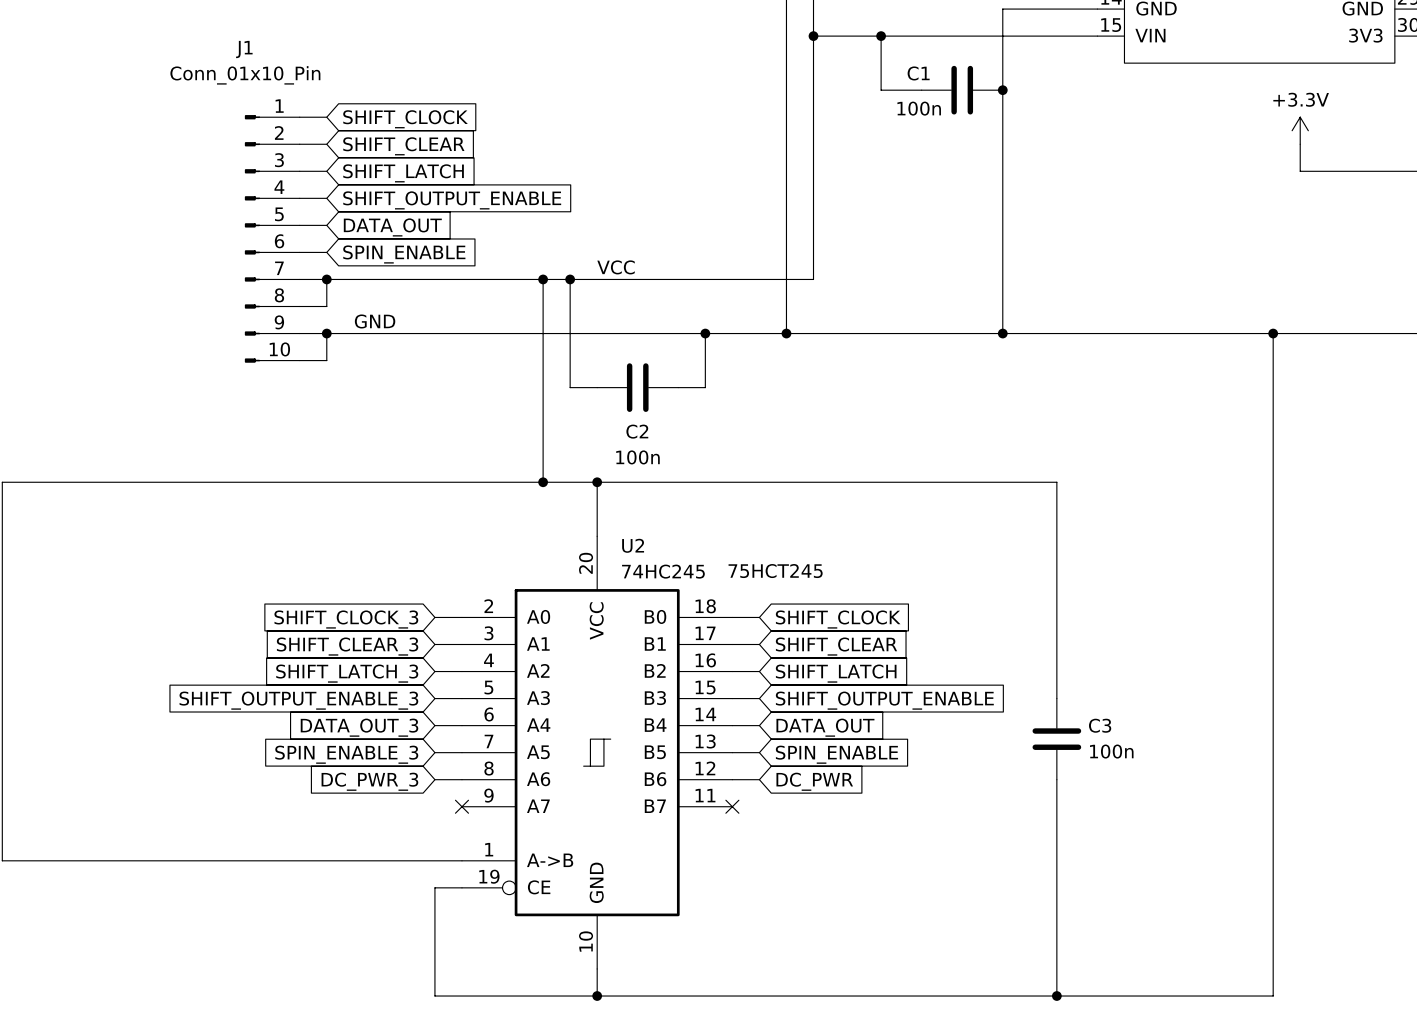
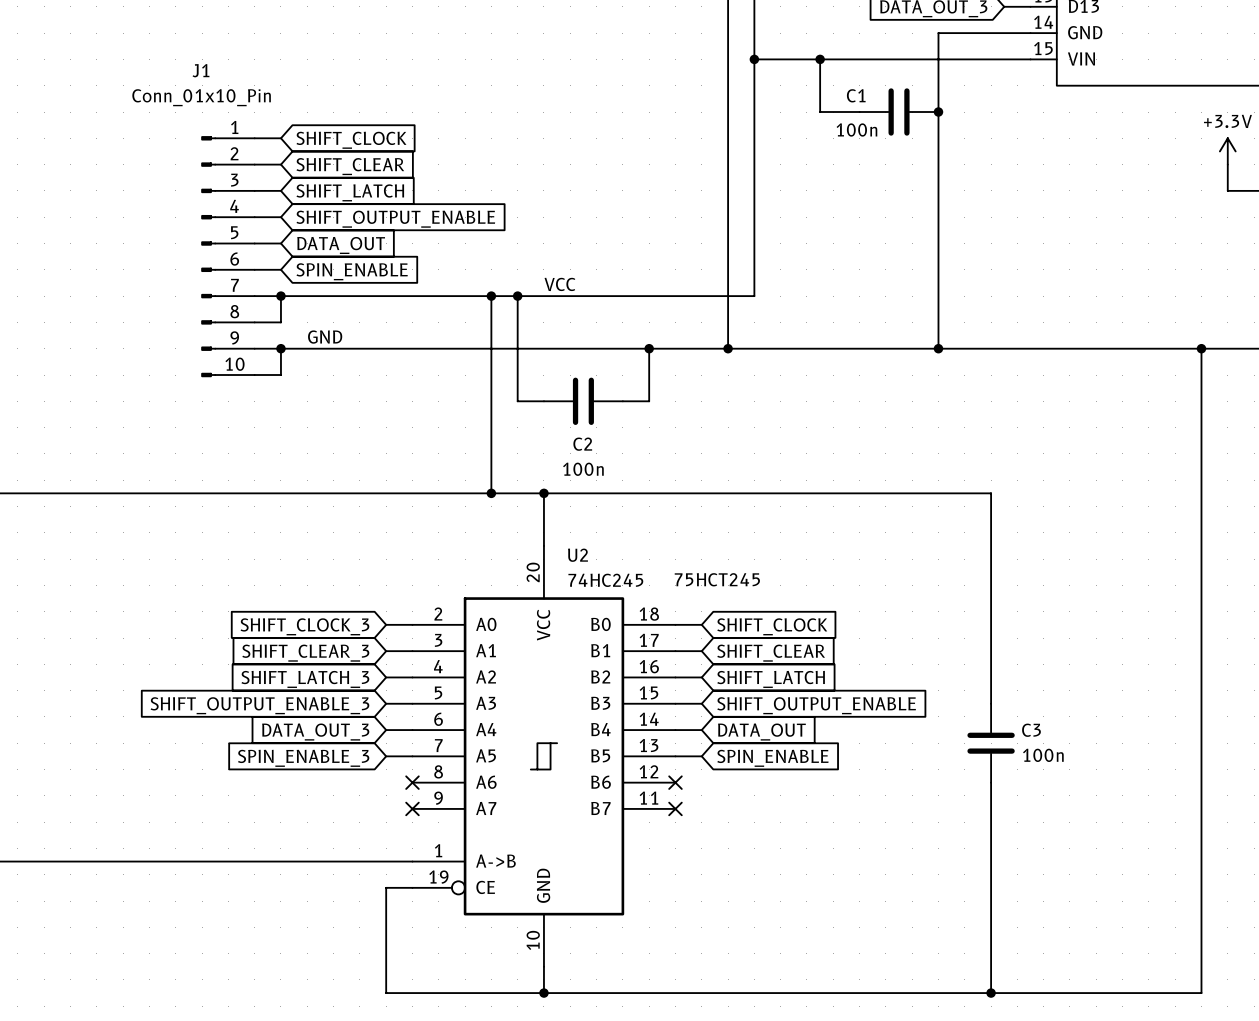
wire: (434, 779) (461, 779) -> none
no-connect mark: none -> (412, 782)
wire: (732, 779) (759, 779) -> none
no-connect mark: none -> (675, 782)
global label: DC_PWR_3 (369, 781) -> none
global label: DC_PWR (814, 781) -> none

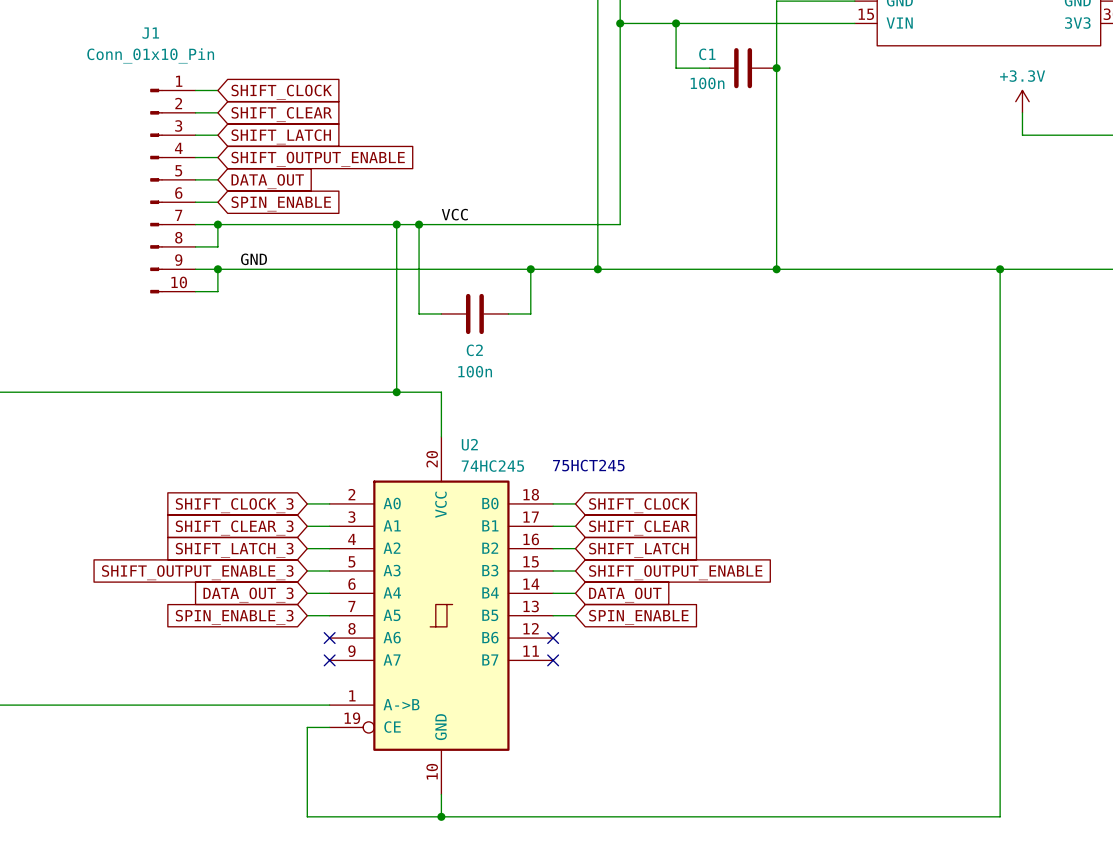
wire: (543, 493) (991, 493) (991, 703) -> none
junction: (543, 493) -> none
C3: 100n (991, 743) -> none
wire: (991, 782) (991, 993) -> none
junction: (991, 993) -> none

